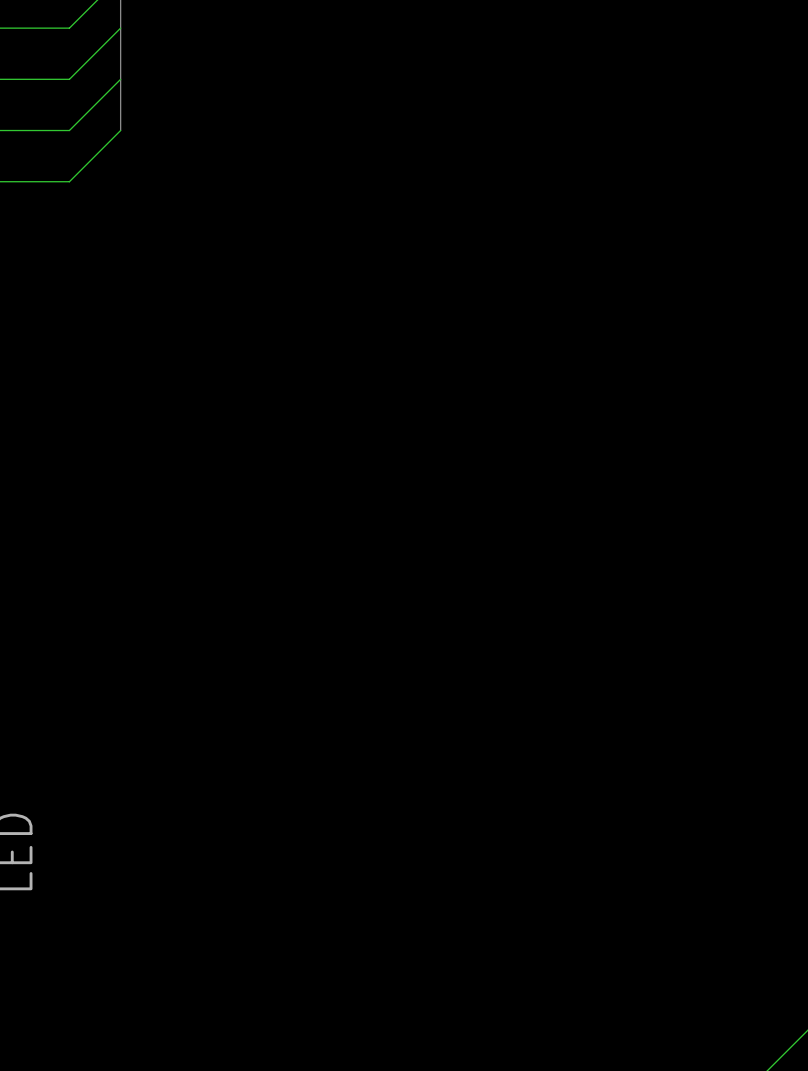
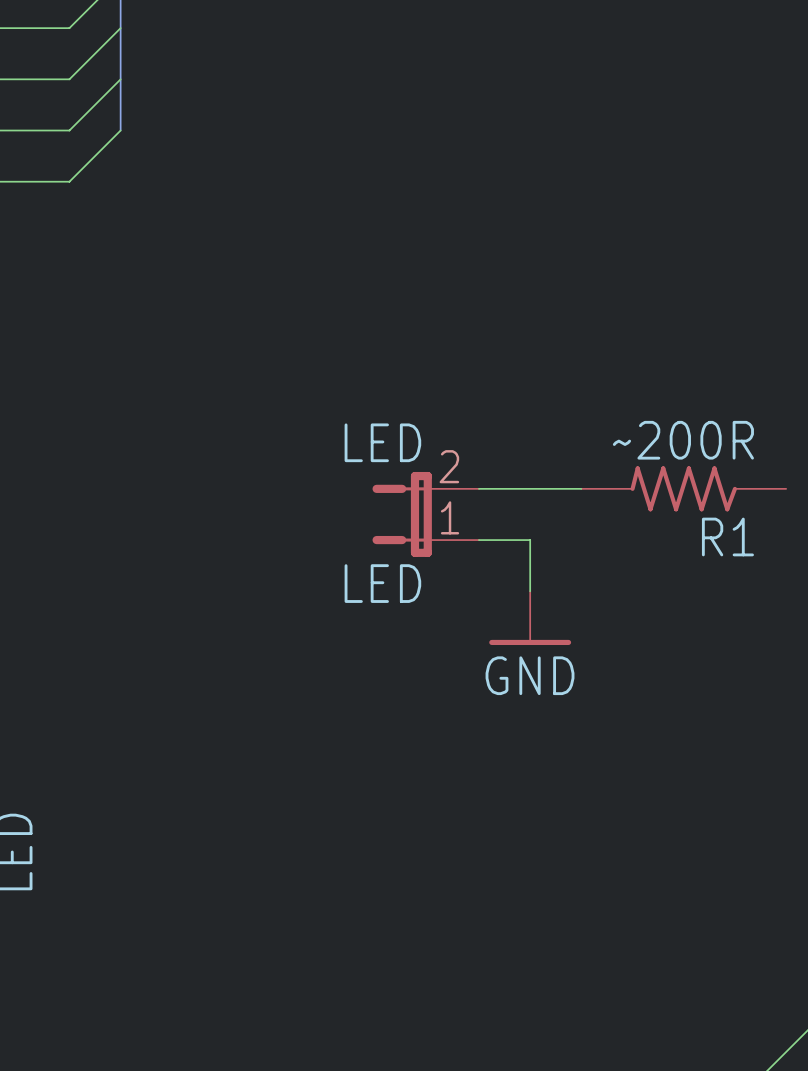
wire: none -> (478, 488) (581, 488)
R1: none -> ~200R (683, 488)
LED: none -> LED (425, 514)
wire: none -> (478, 540) (530, 540) (530, 591)
power symbol: none -> GND (530, 618)

